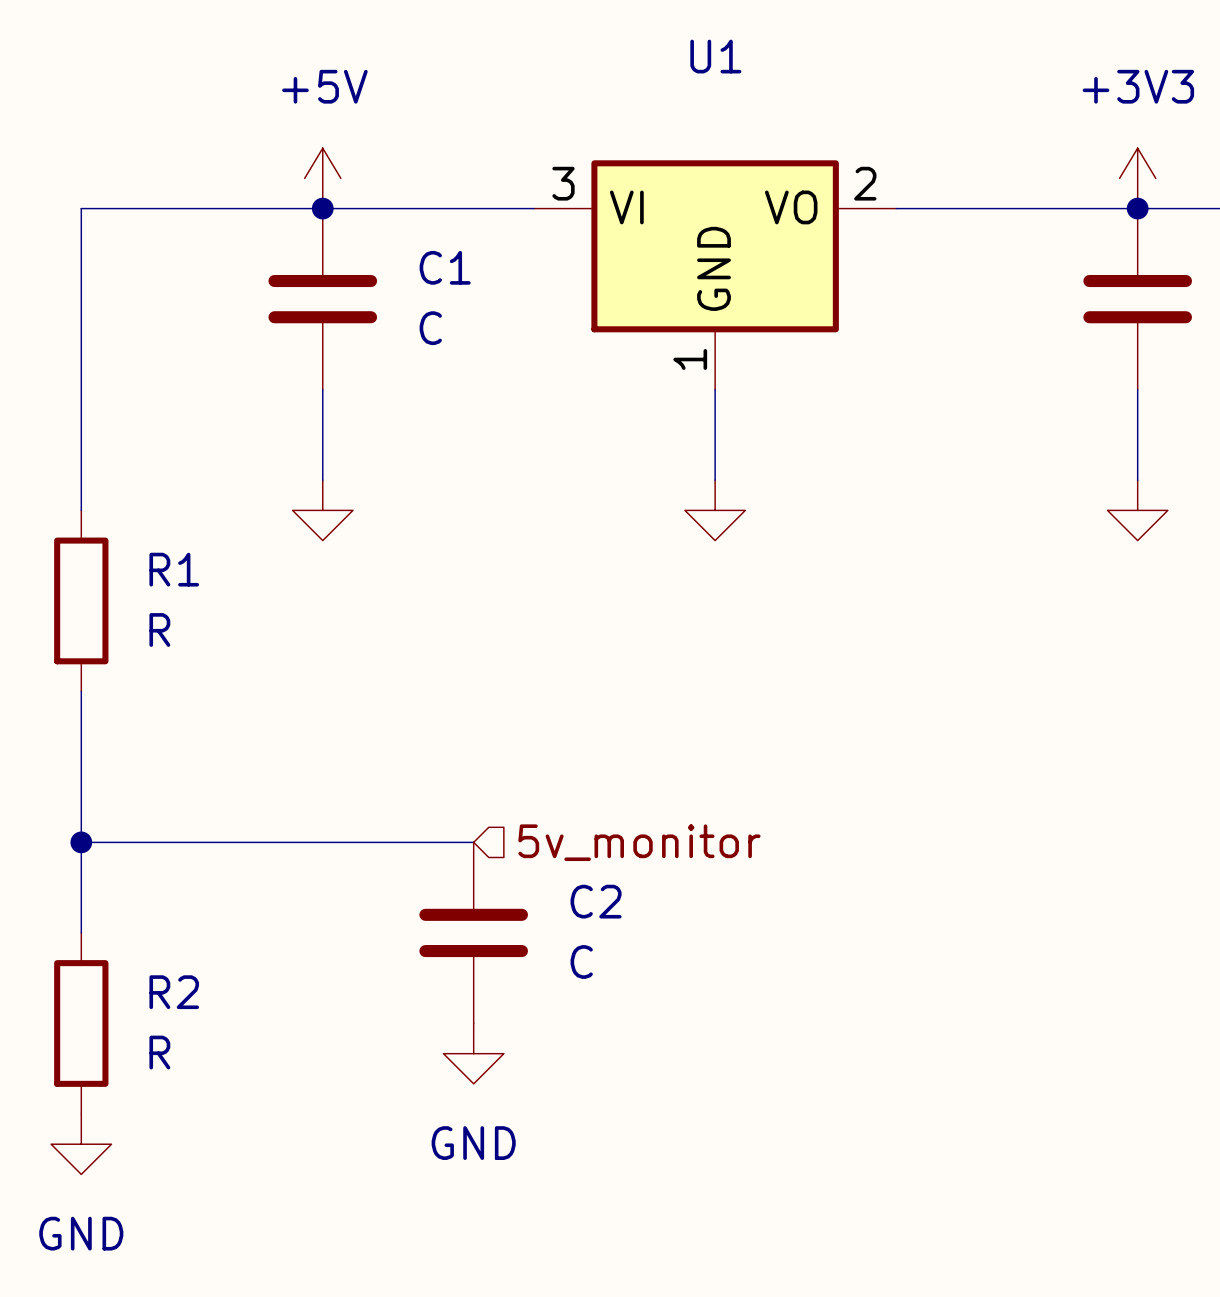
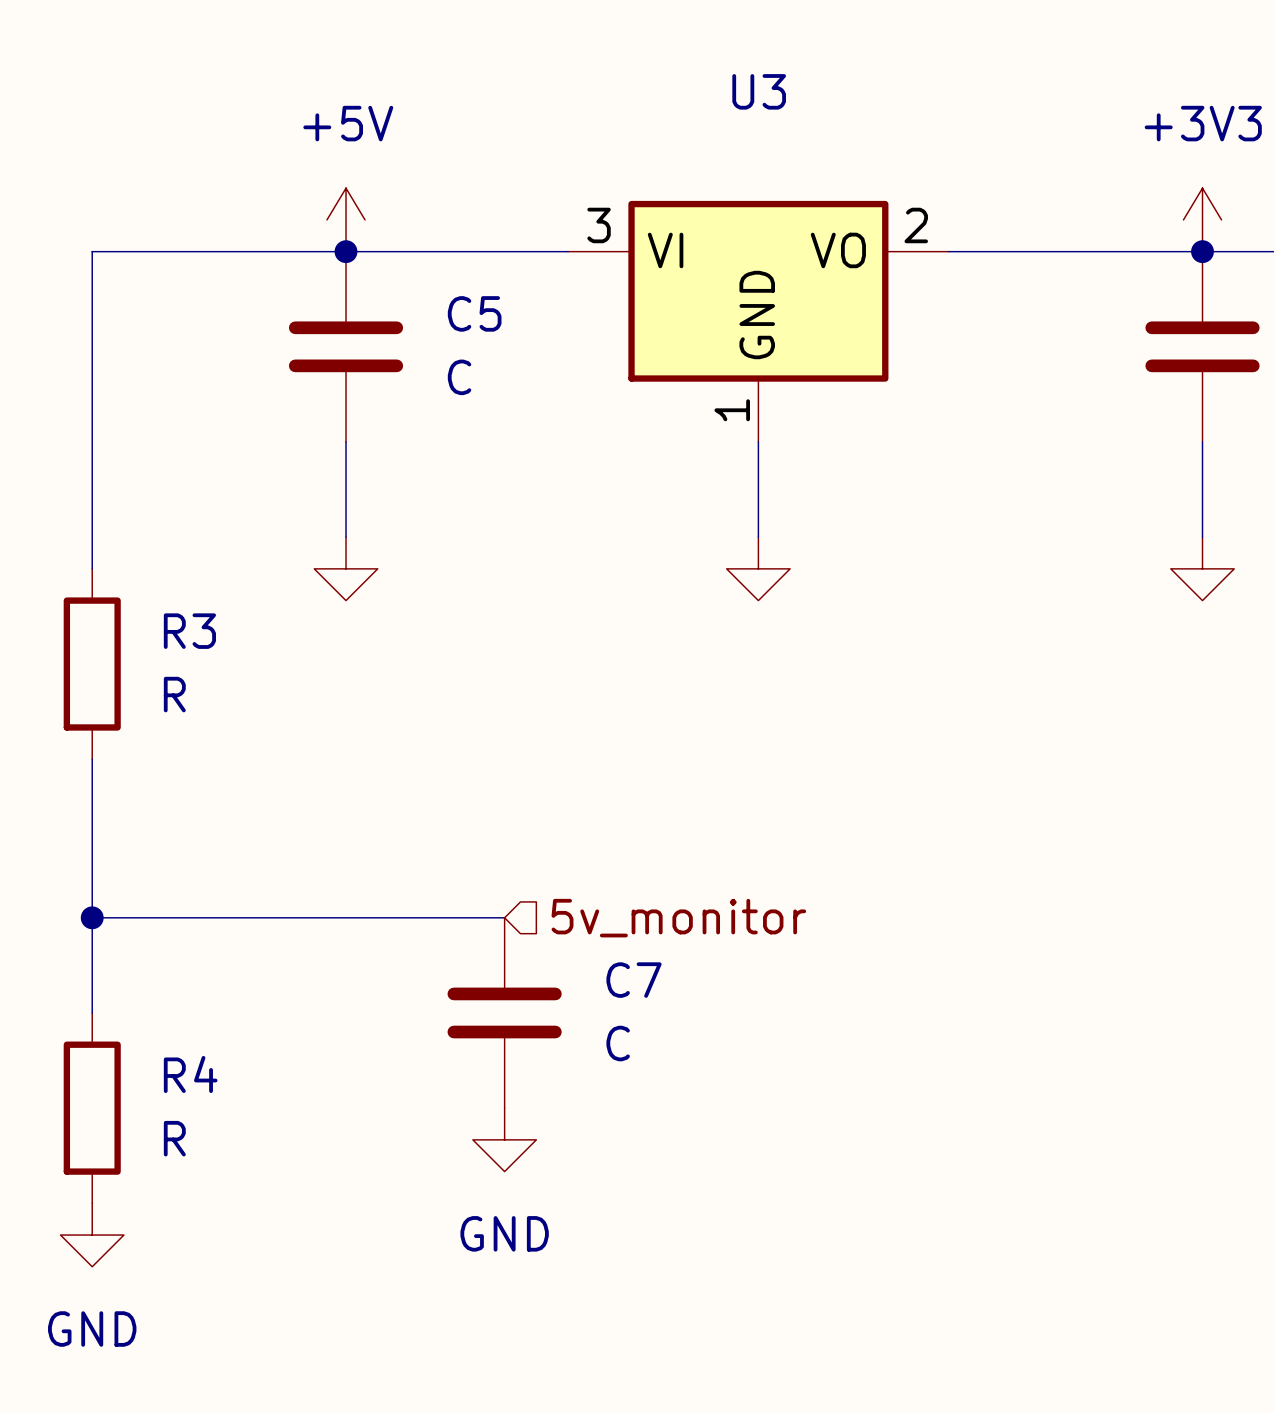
U1 name: U1 (715, 56) -> U3 (759, 91)
C1 name: C1 (445, 267) -> C5 (474, 313)
R1 name: R1 (174, 569) -> R3 (189, 631)
C2 name: C2 (596, 901) -> C7 (634, 980)
R2 name: R2 (174, 992) -> R4 (190, 1074)

